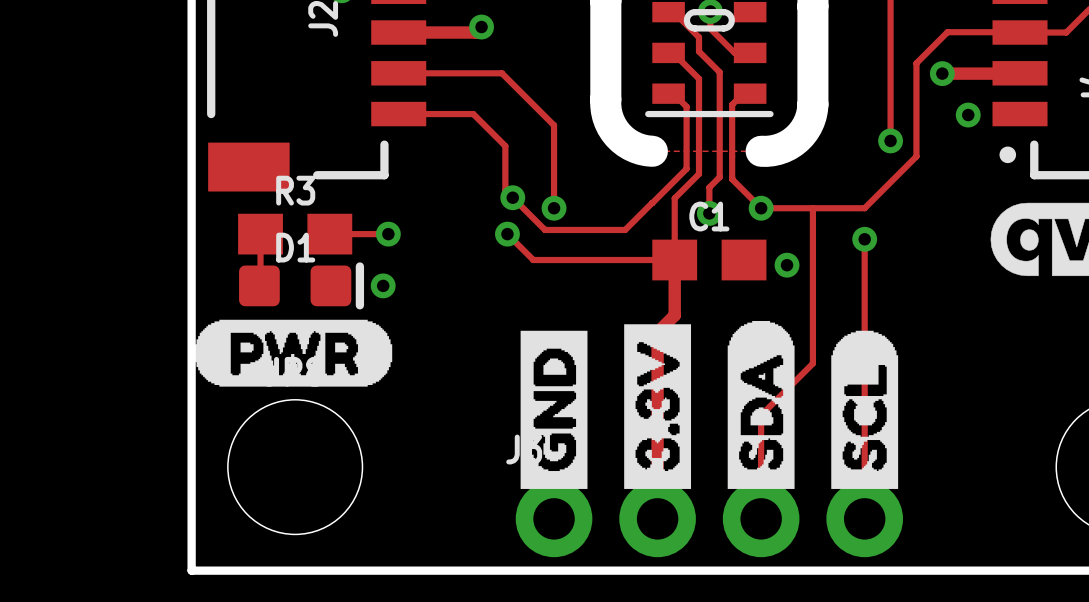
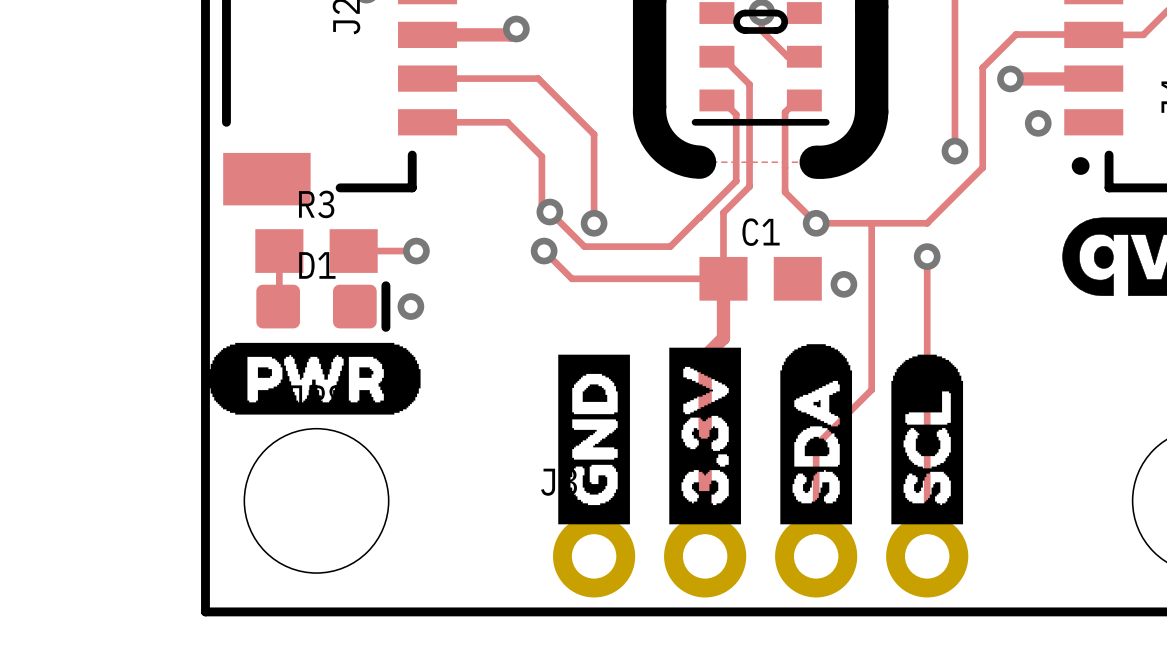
track: (668, 12) (673, 12) (699, 37) (699, 51) (719, 72) (719, 177) (709, 187) (709, 213) -> none
via: (709, 213) -> none

